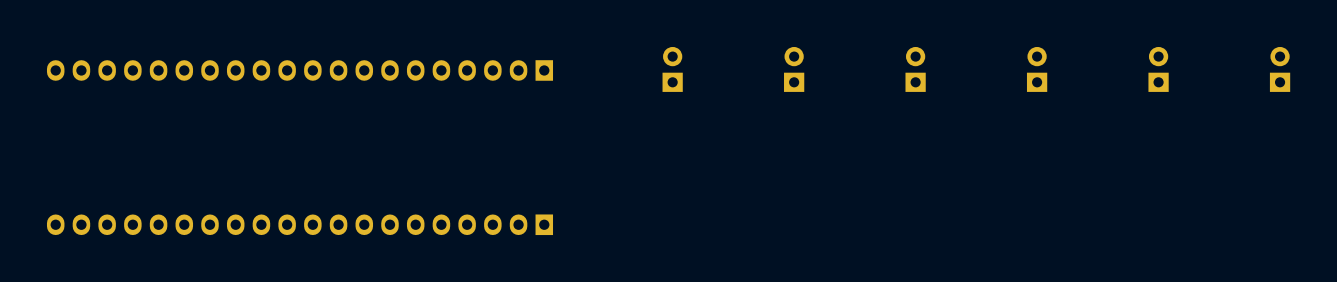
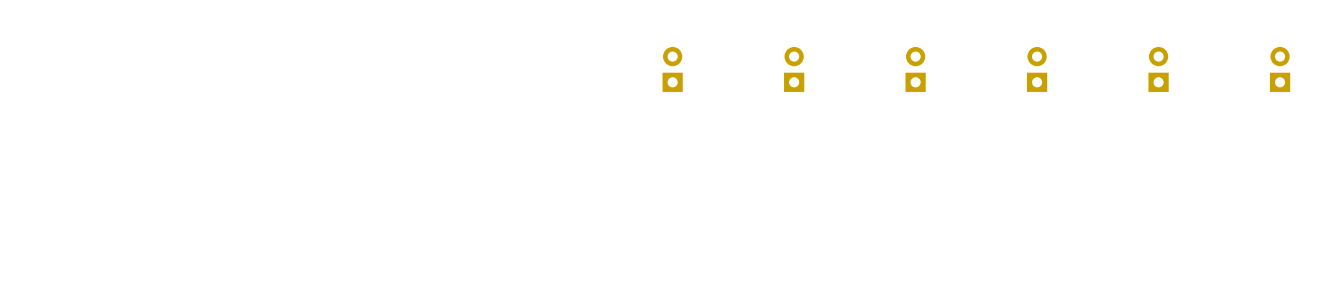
part: (300, 70) -> none
part: (300, 224) -> none

